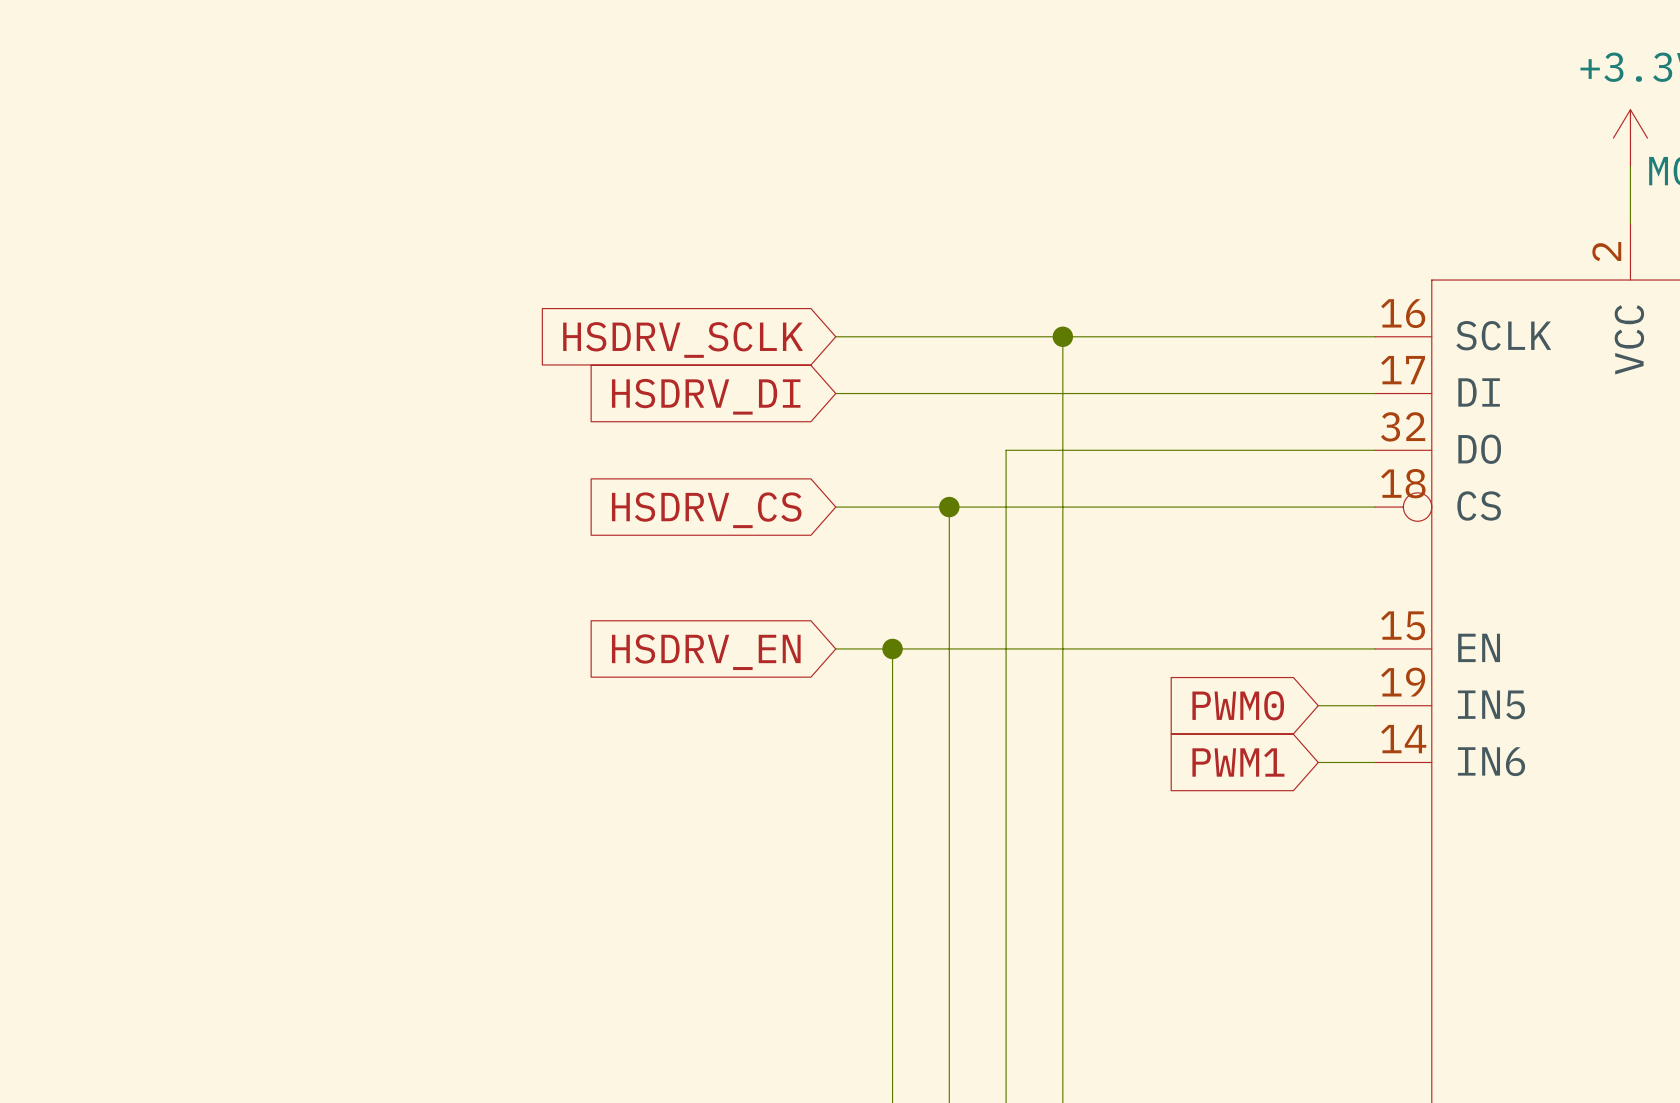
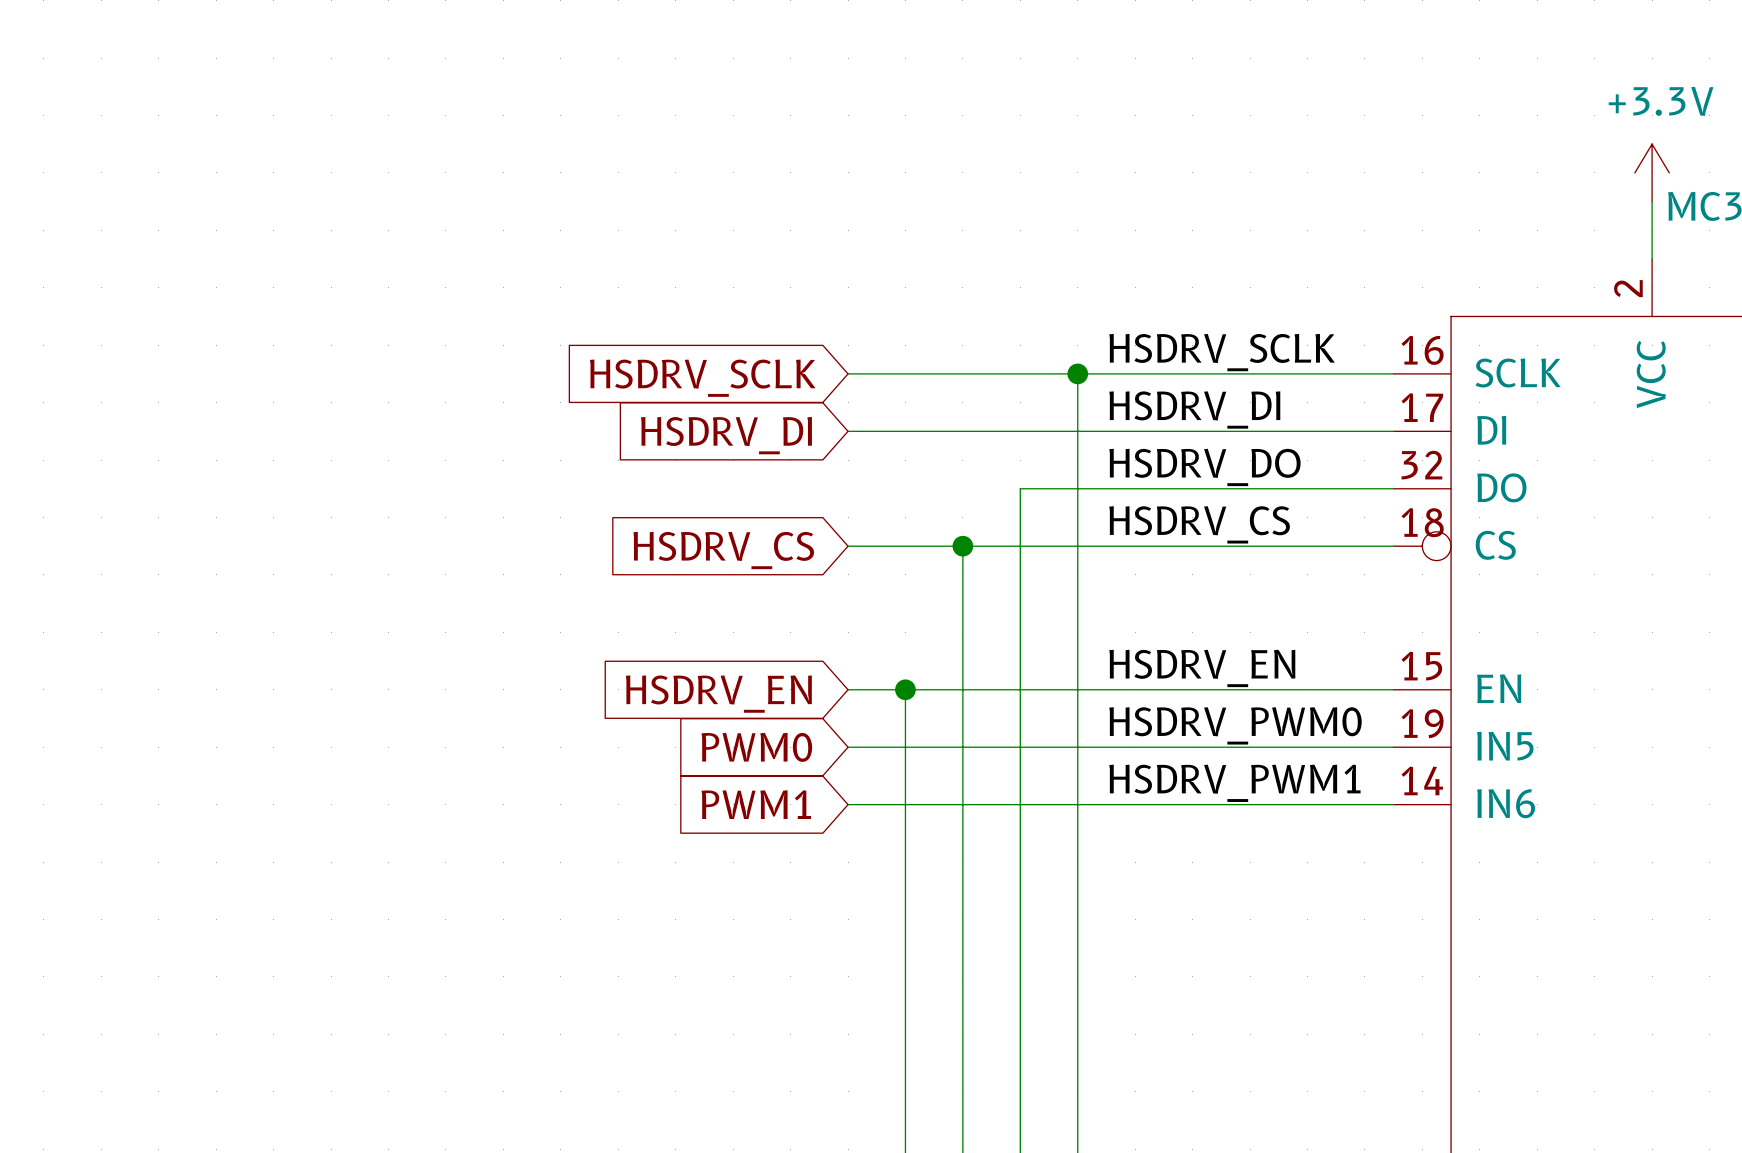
label: none -> HSDRV_SCLK (1222, 352)
label: none -> HSDRV_DI (1194, 410)
label: none -> HSDRV_DO (1204, 467)
label: none -> HSDRV_CS (1199, 524)
label: none -> HSDRV_EN (1202, 668)
label: none -> HSDRV_PWM0 (1235, 725)
wire: none -> (848, 747) (1336, 747)
global label position: PWM0 (1238, 705) -> PWM0 (756, 747)
label: none -> HSDRV_PWM1 (1234, 783)
wire: none -> (848, 804) (1336, 804)
global label position: PWM1 (1238, 762) -> PWM1 (756, 804)

